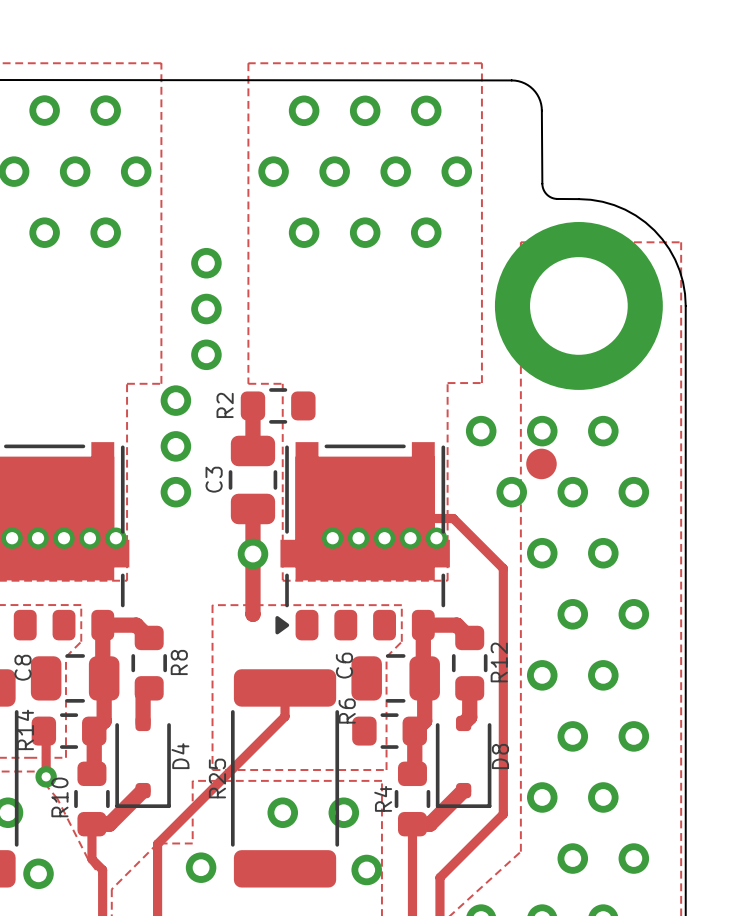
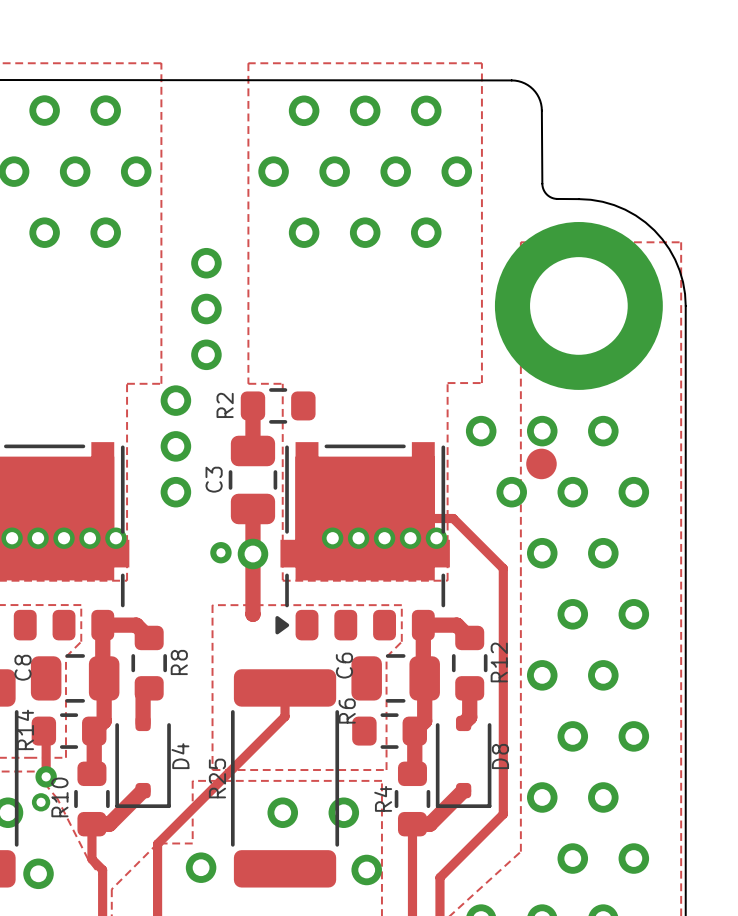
via: none -> (220, 552)
via: none -> (41, 802)

